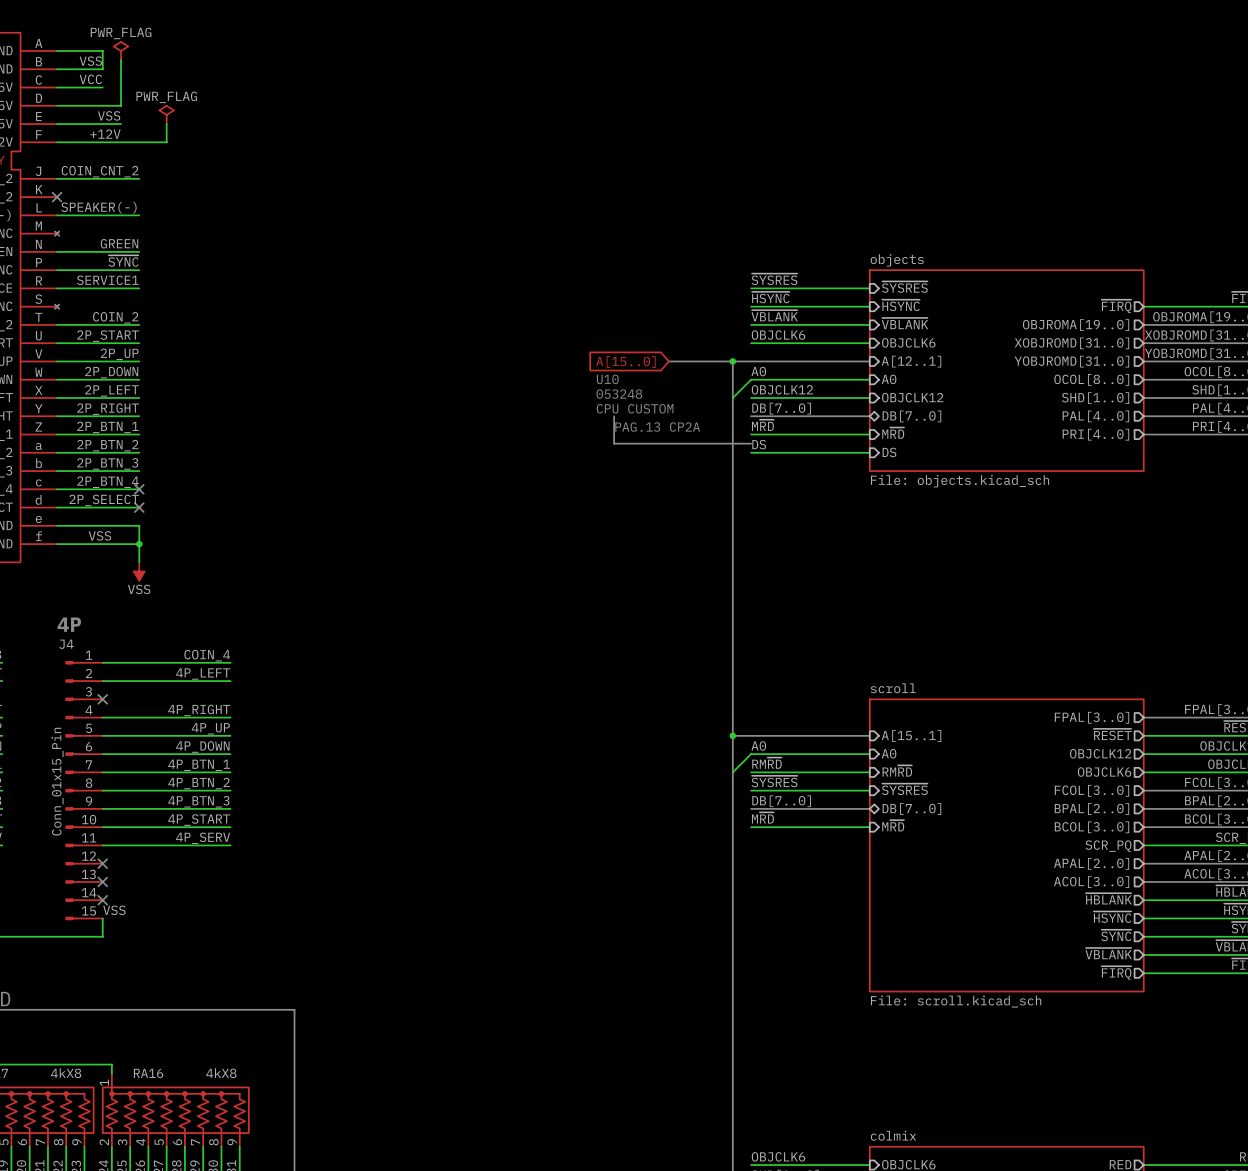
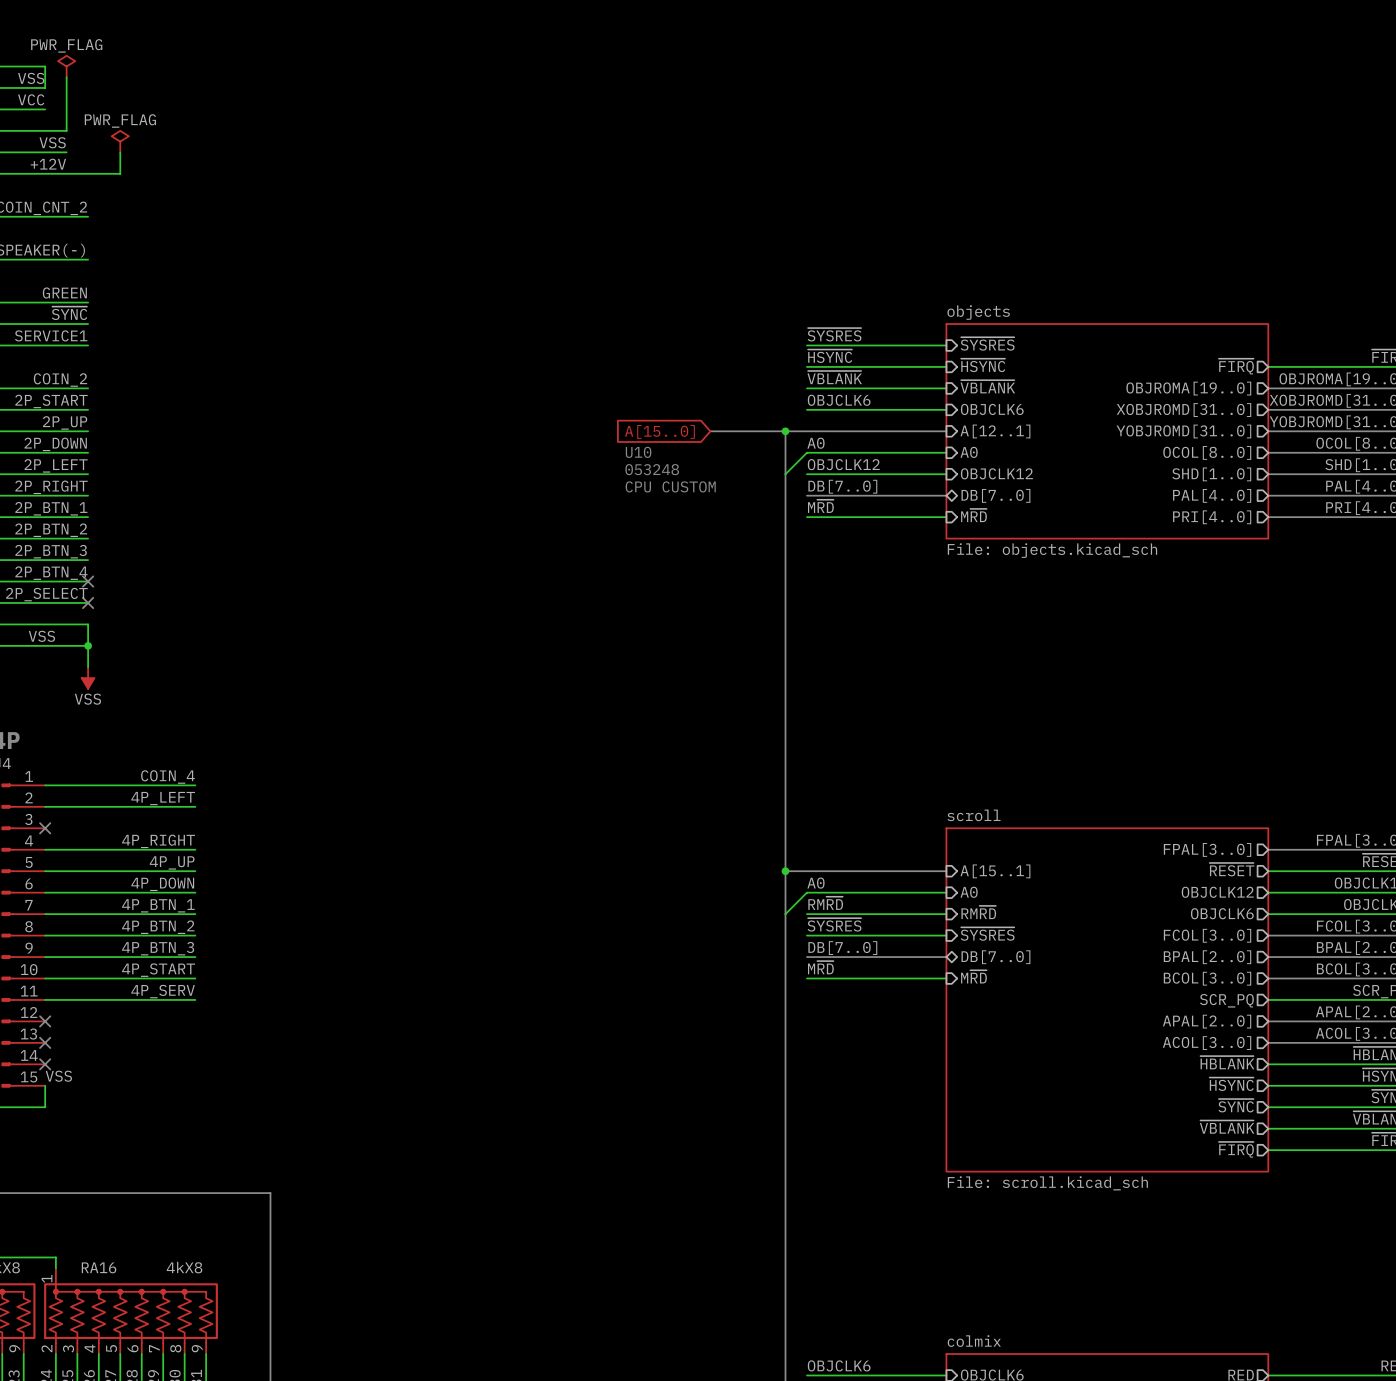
sheet objects: none -> File: objects.kicad_sch (1107, 431)
sheet objects: File: objects.kicad_sch (1006, 370) -> none
line: (614, 416) (614, 443) (751, 443) -> none
text: PAG.13 CP2A (657, 427) -> none
label: DS (759, 444) -> none
wire: (751, 452) (869, 452) -> none
sheet pin: DS (889, 452) -> none

